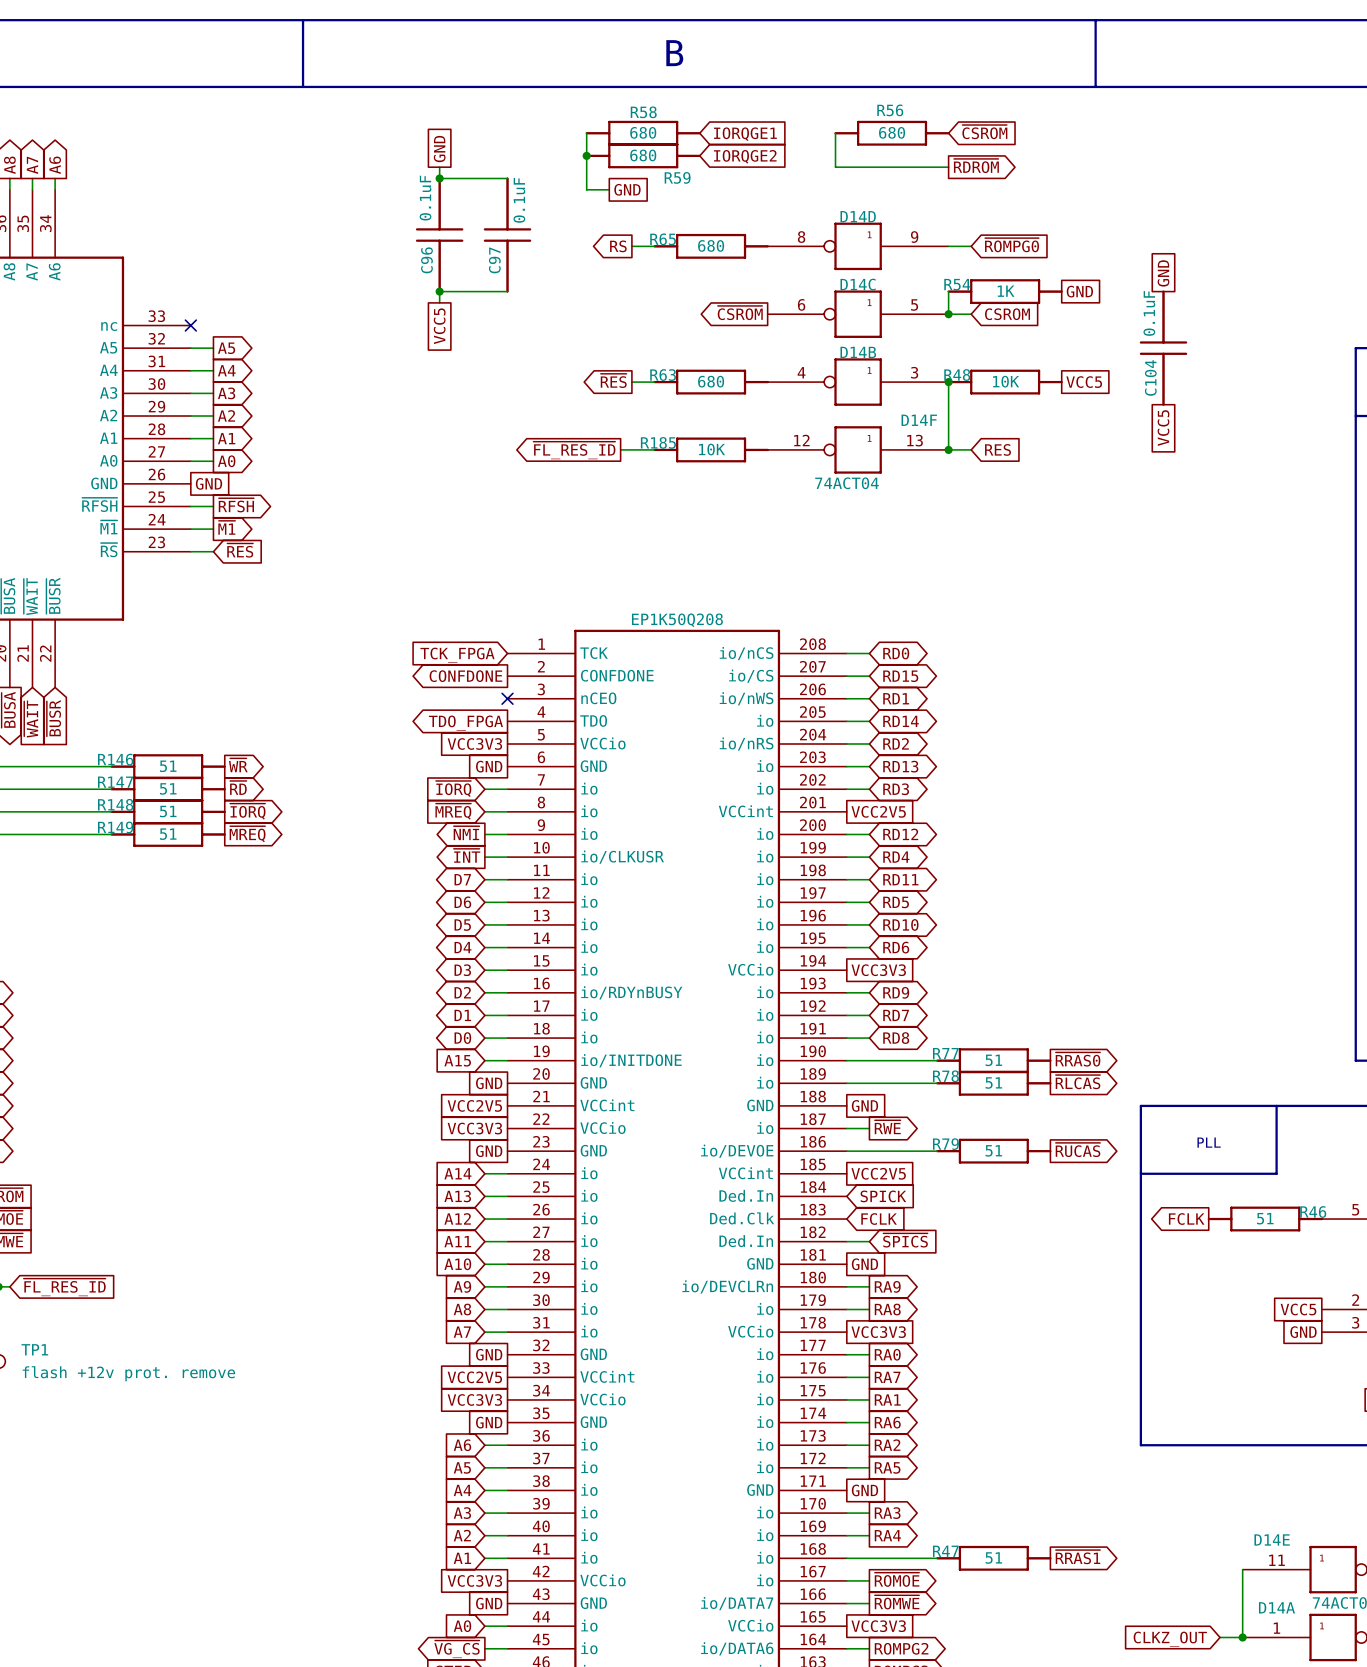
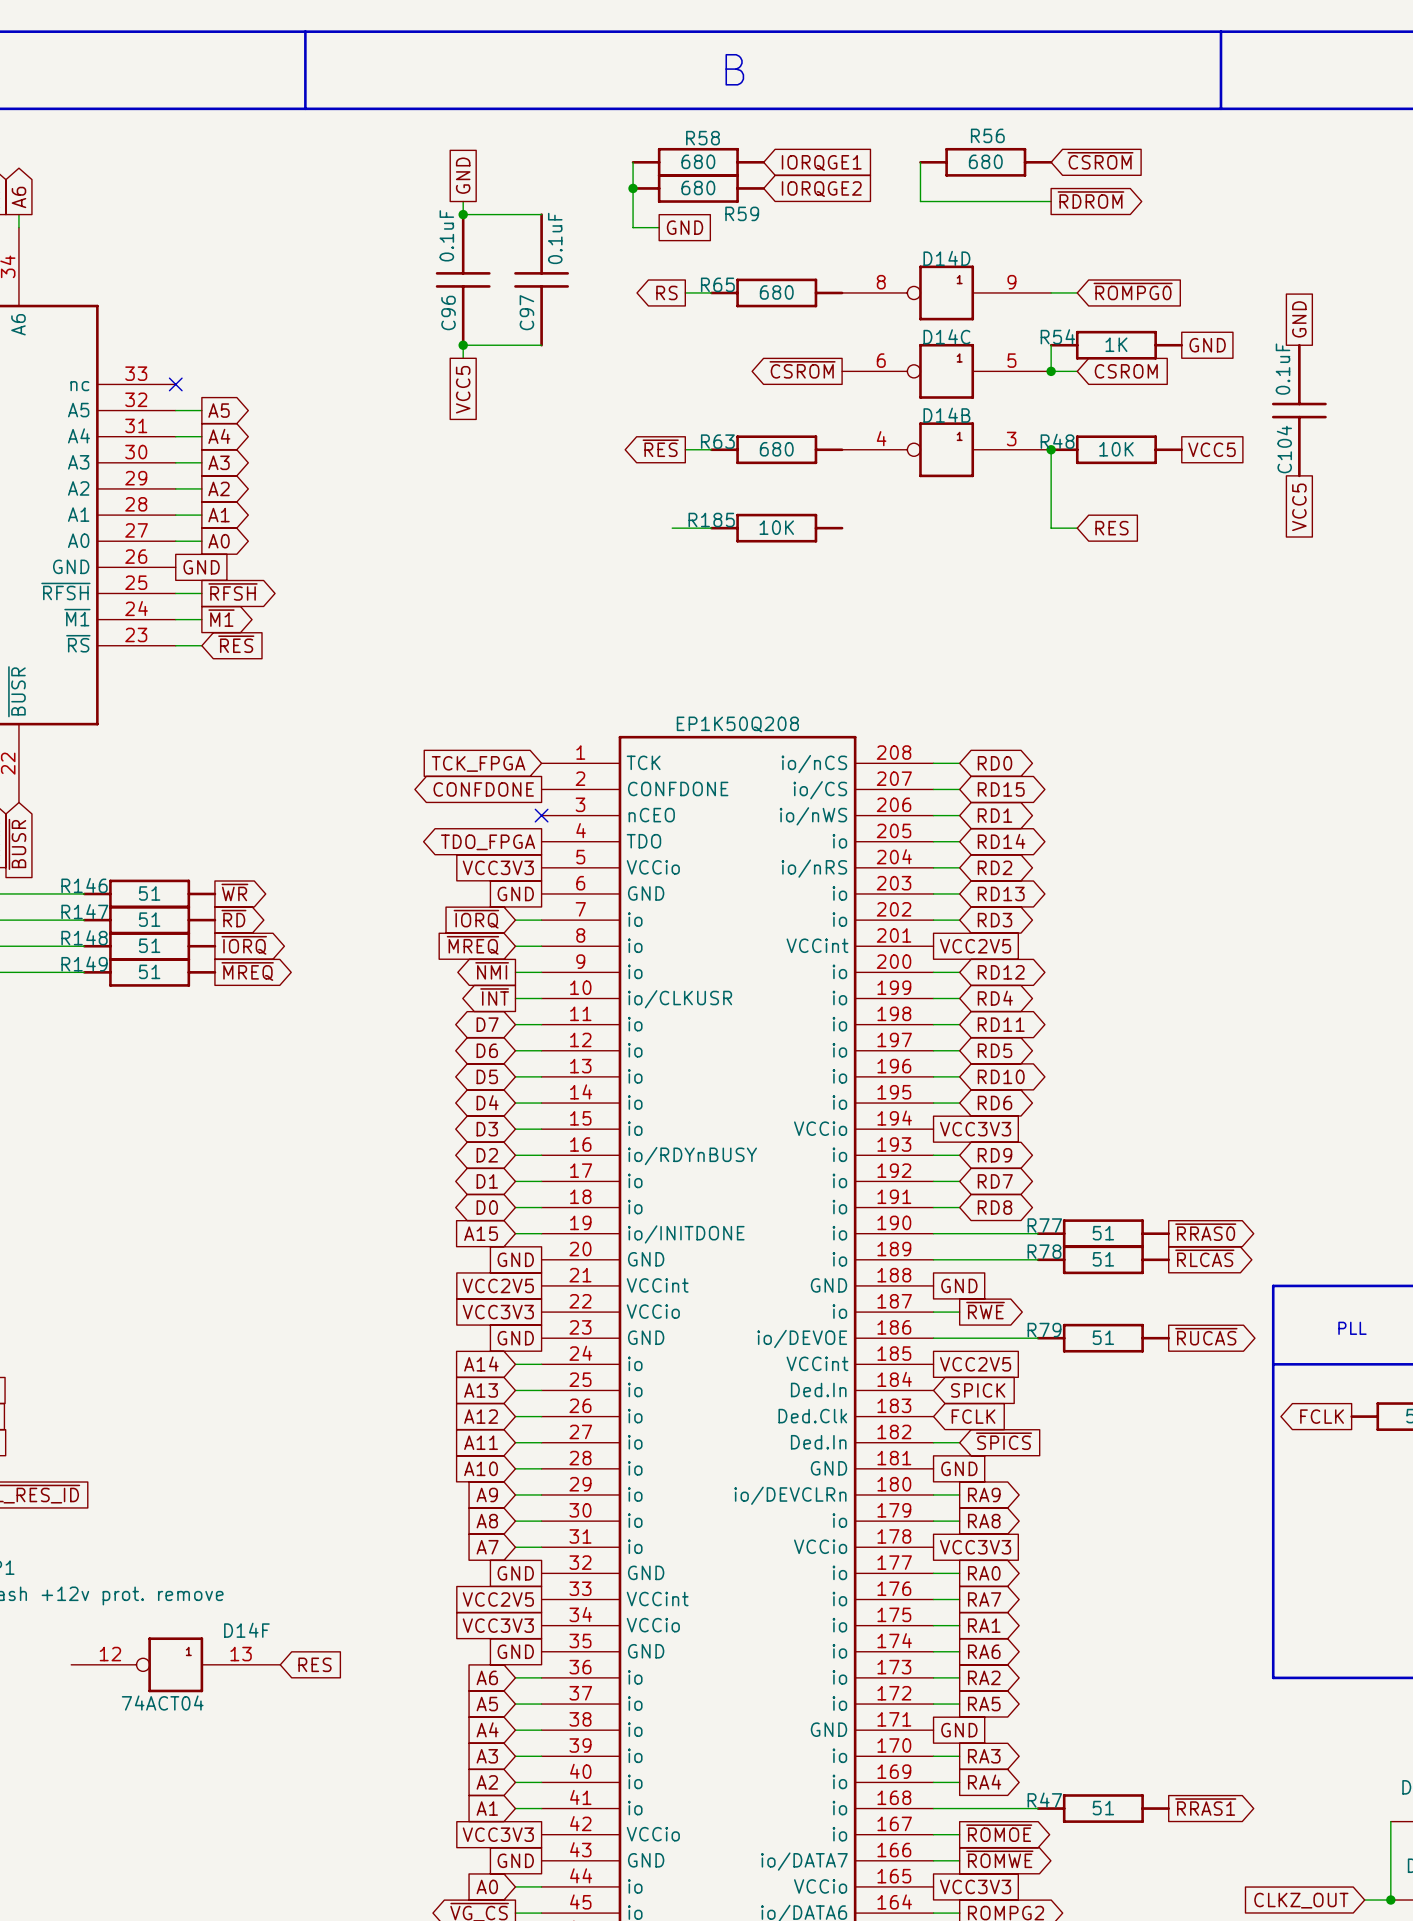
D14F position: (858, 449) -> (175, 1664)
junction: (948, 449) -> none
global label: ~{FL_RES_ID} (574, 450) -> none
global label: none -> RES (314, 1664)

